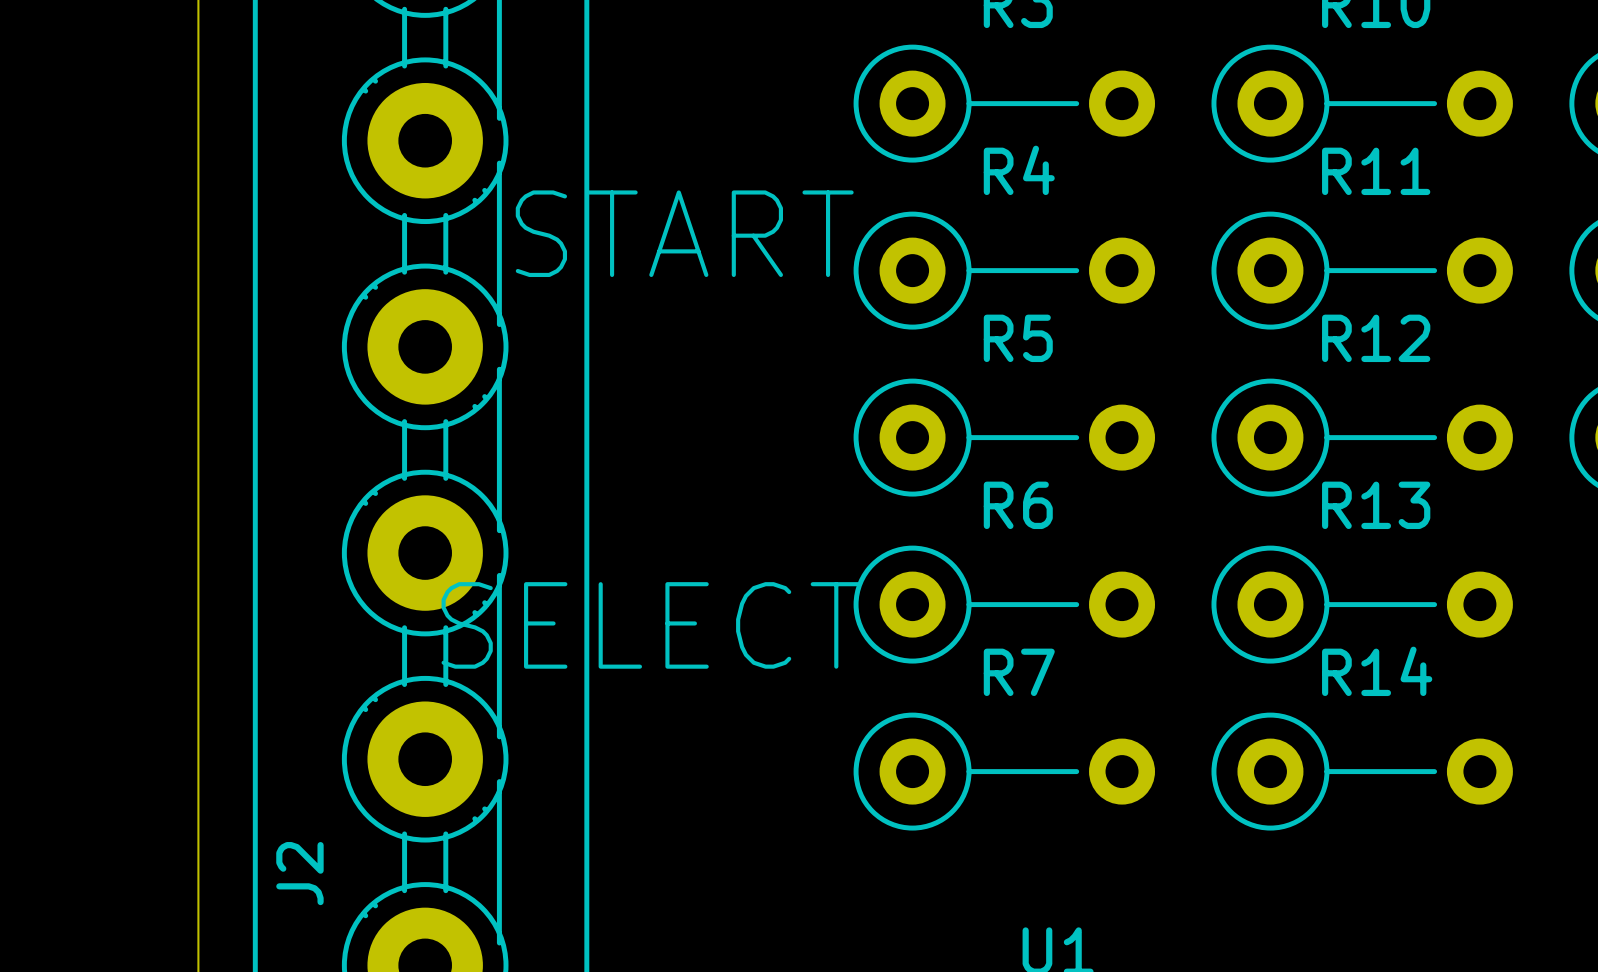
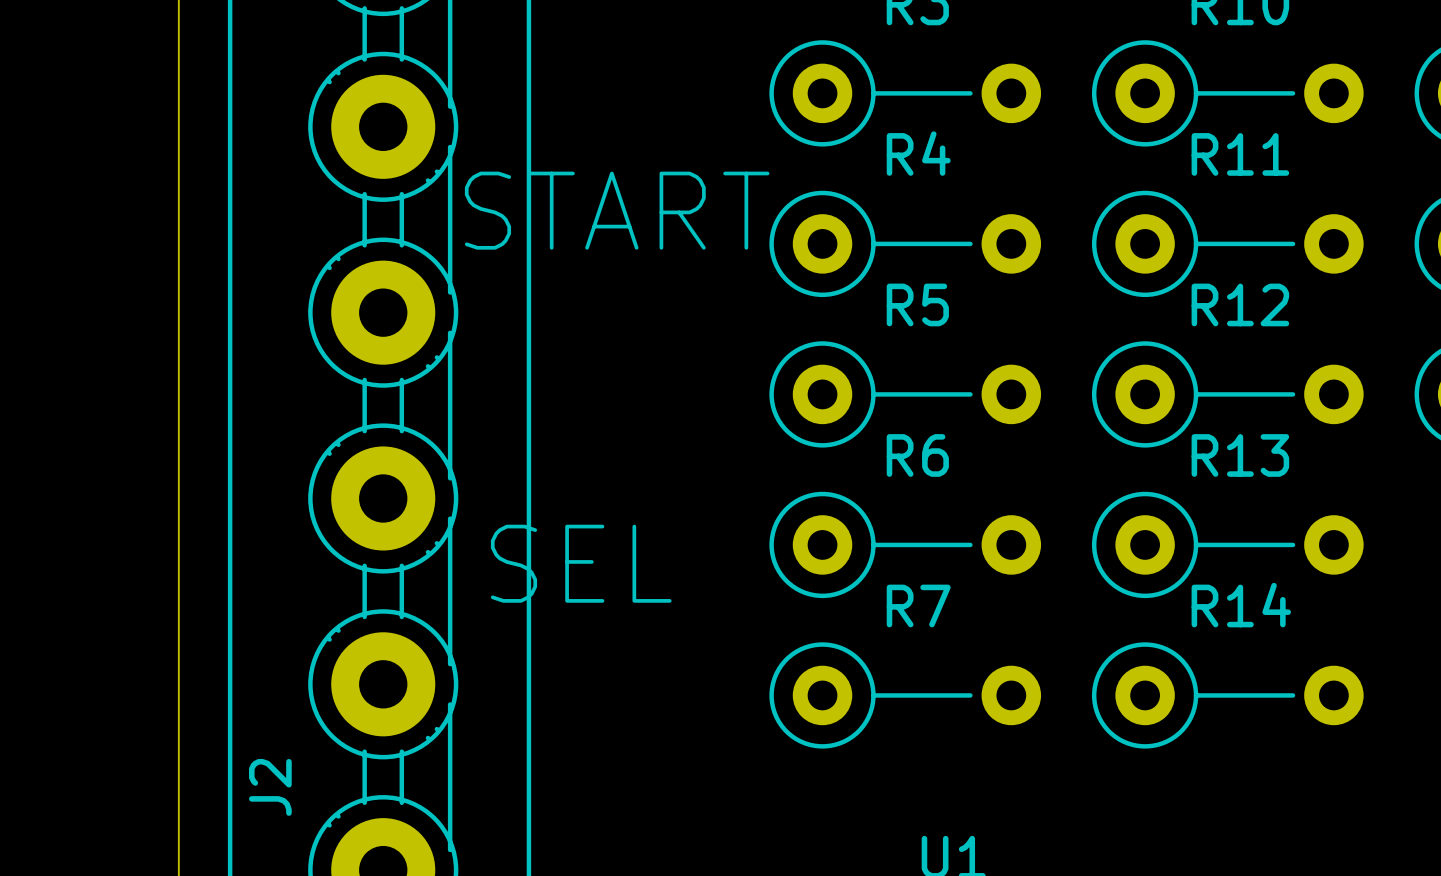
text: SELECT (651, 625) -> SEL (581, 563)

